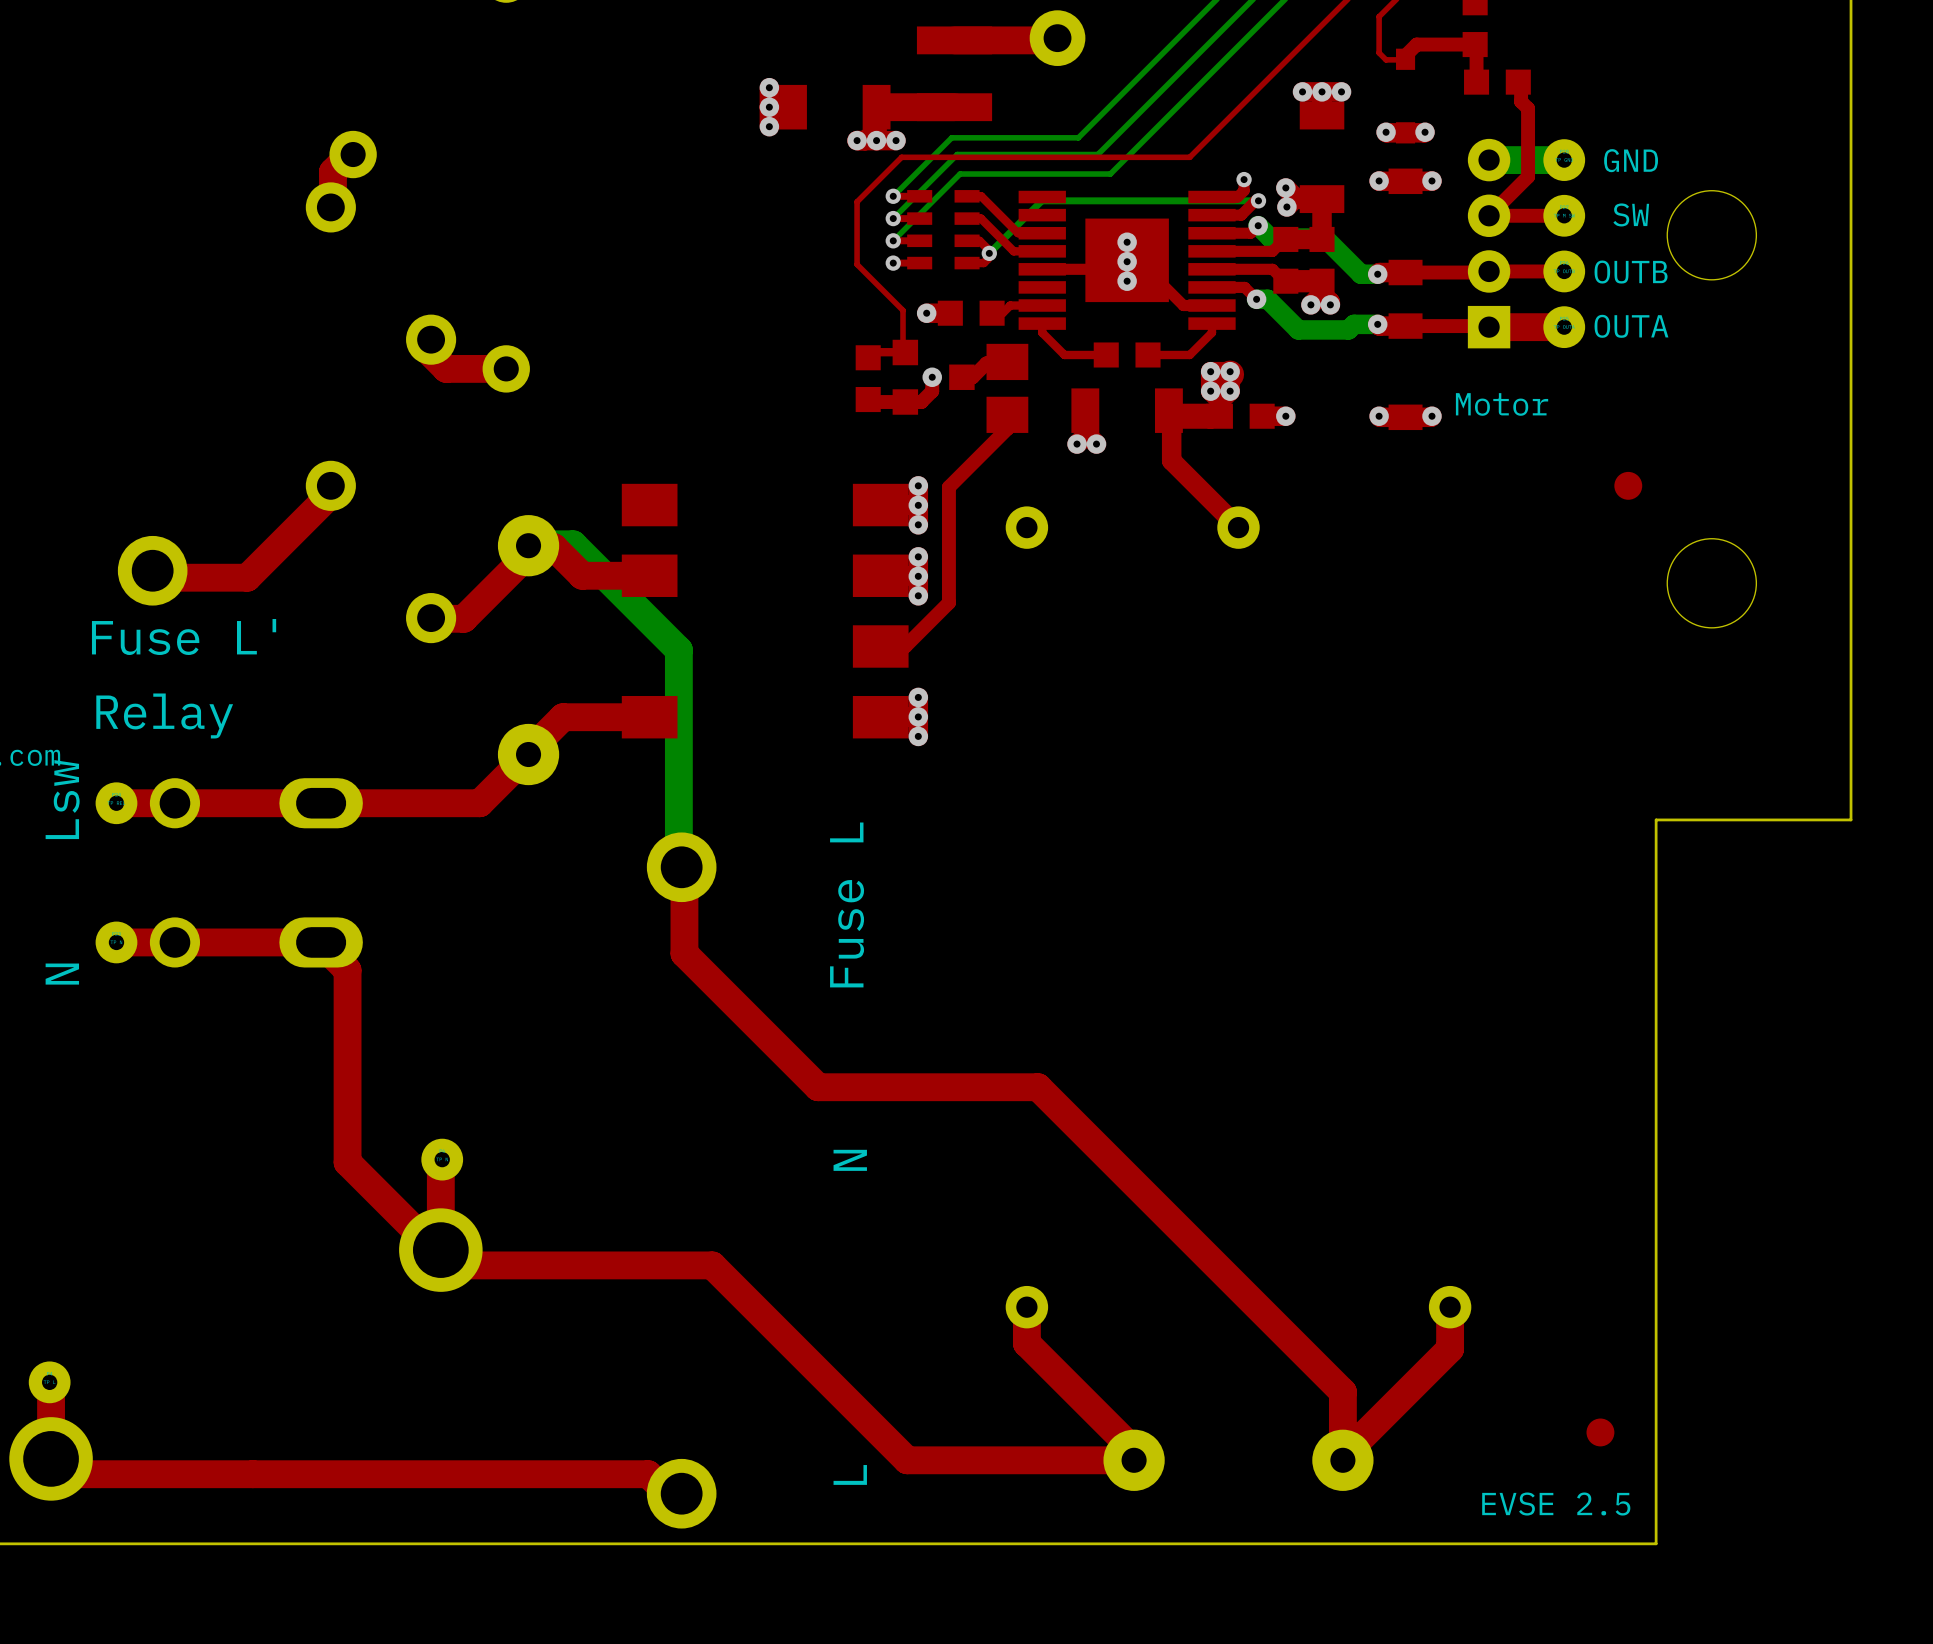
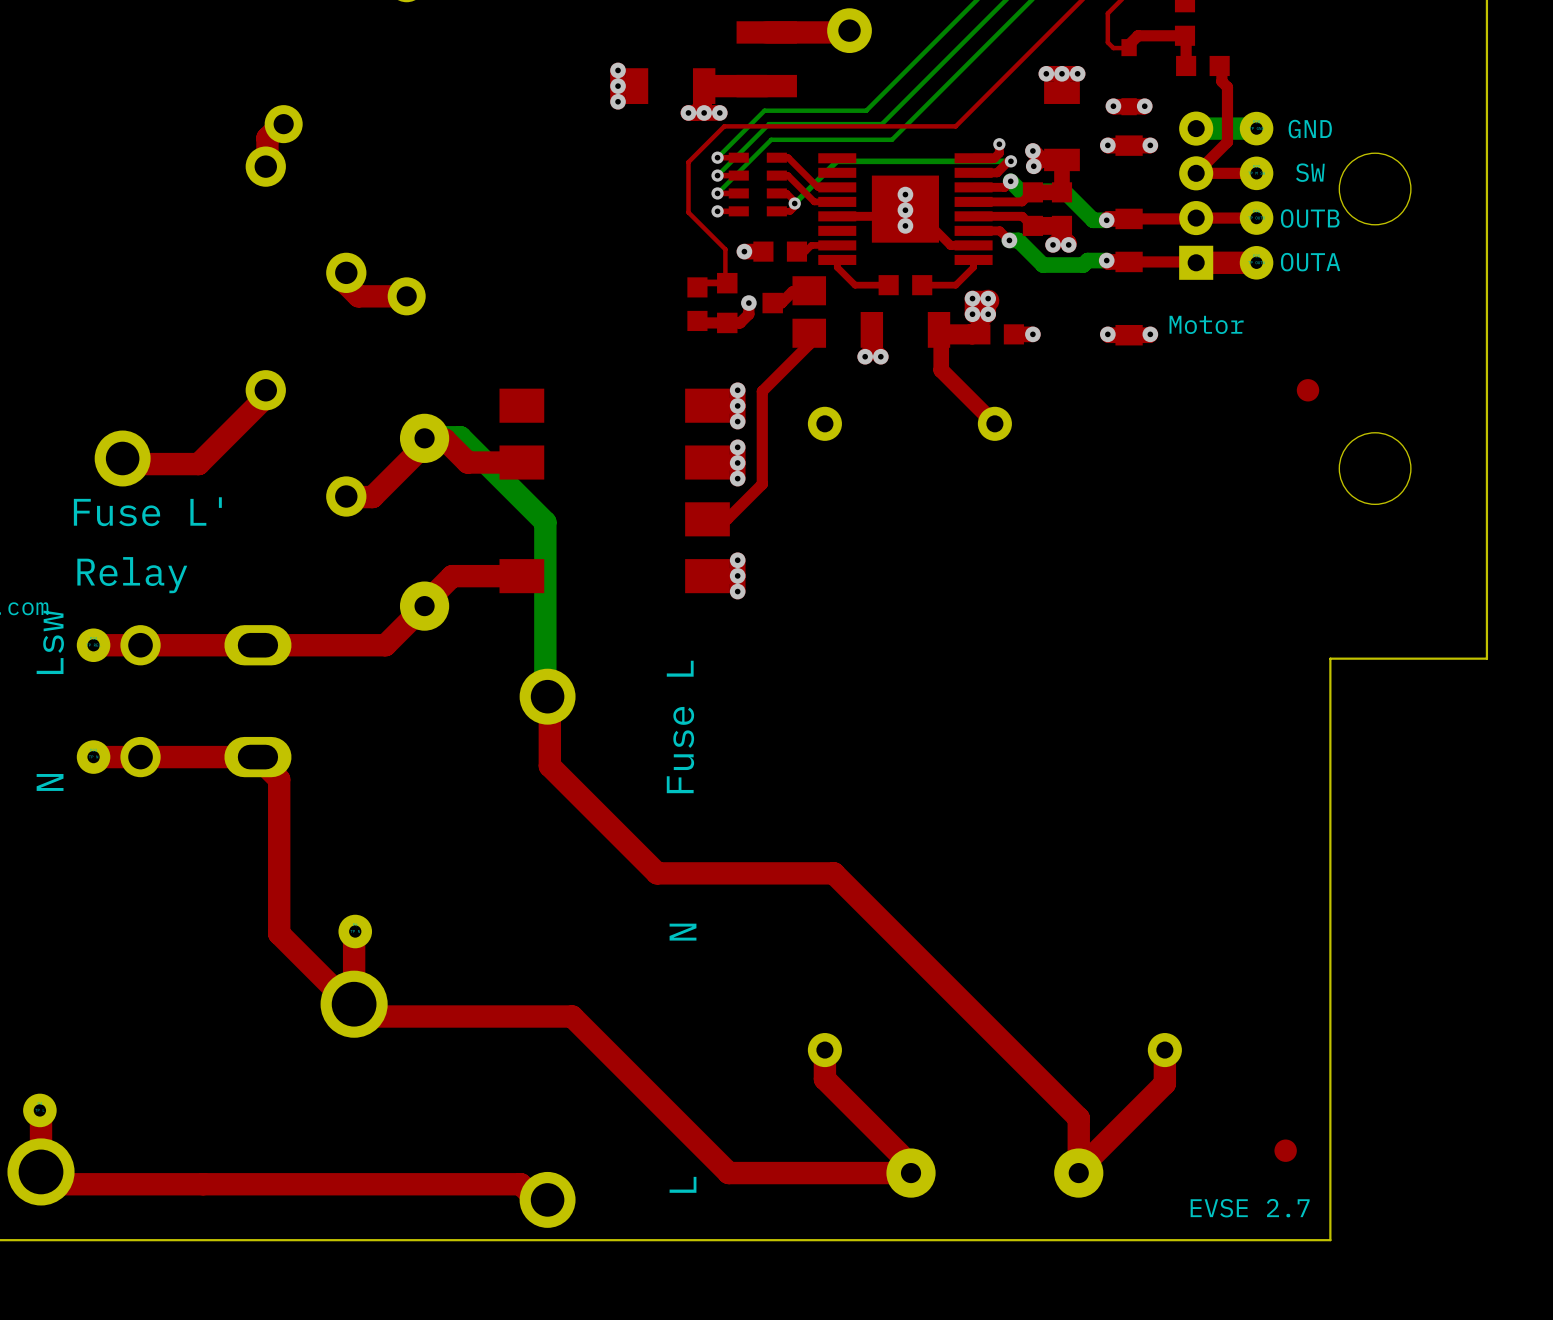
text: EVSE 2.5 (1556, 1504) -> EVSE 2.7 (1250, 1208)

